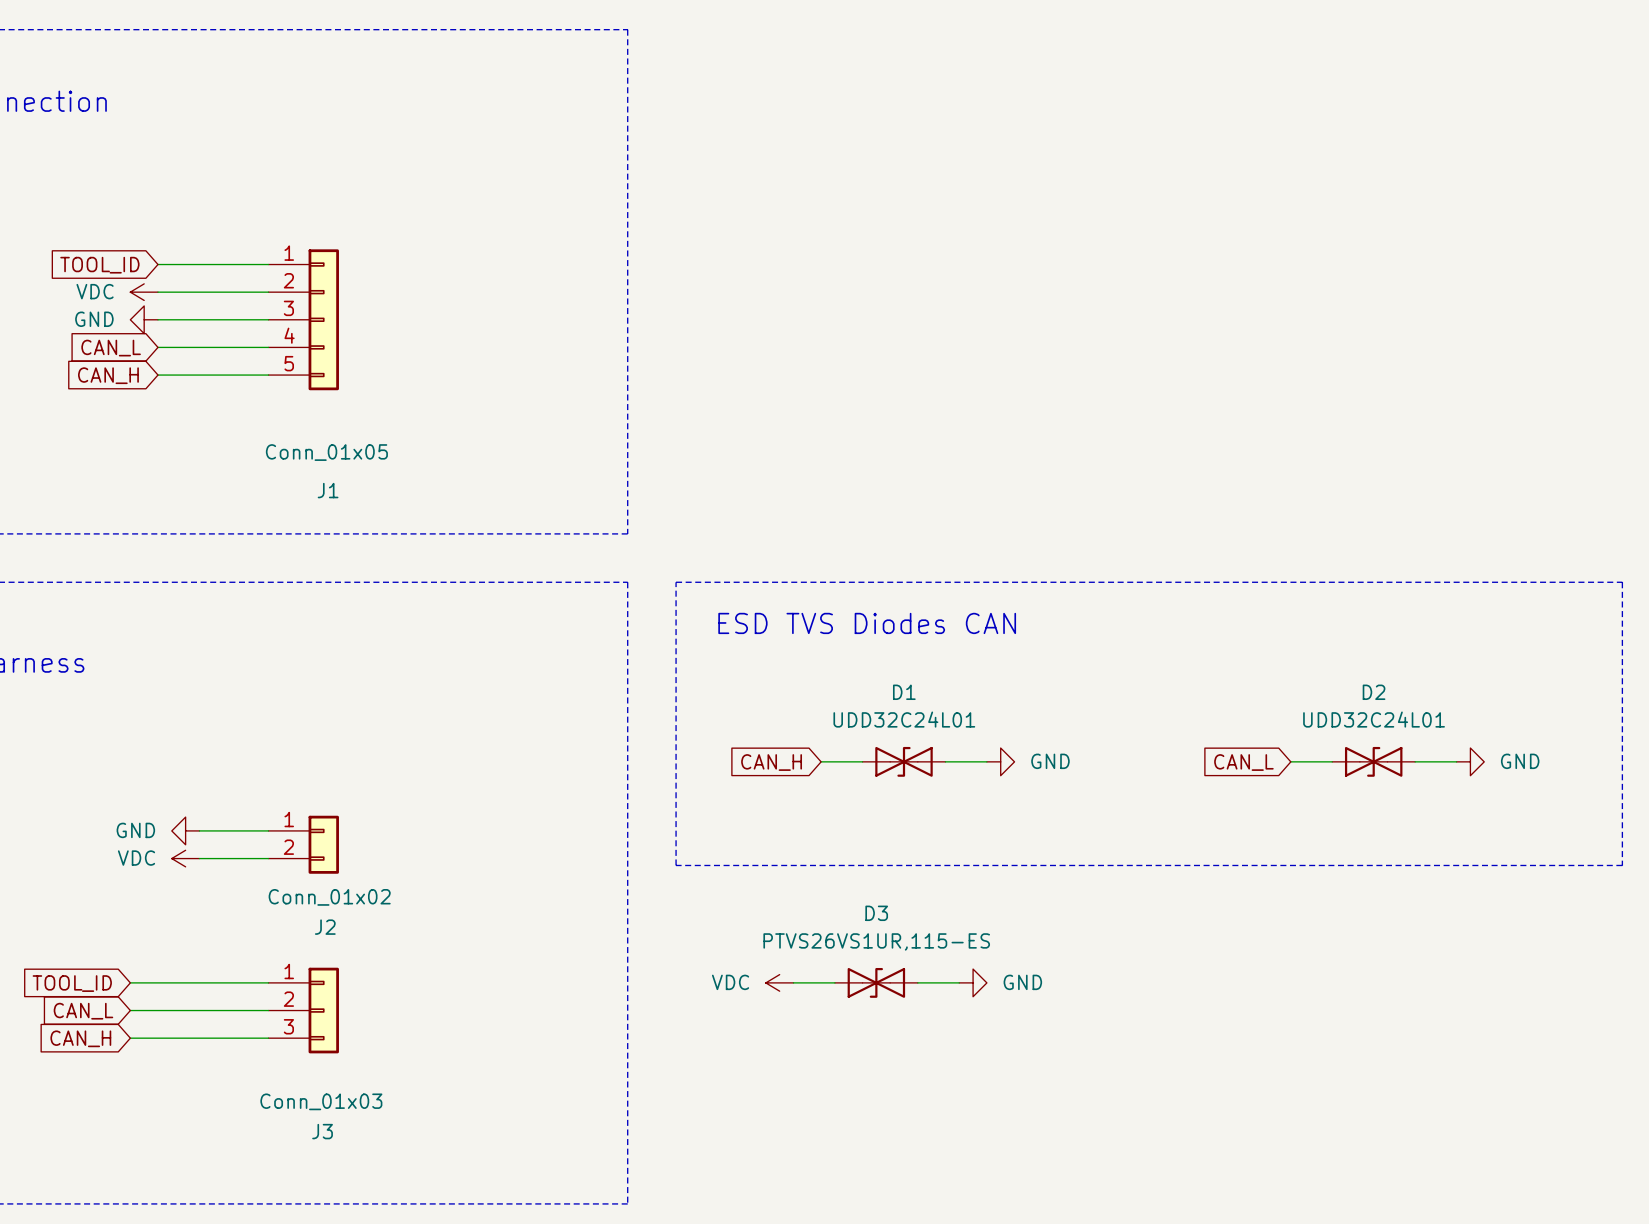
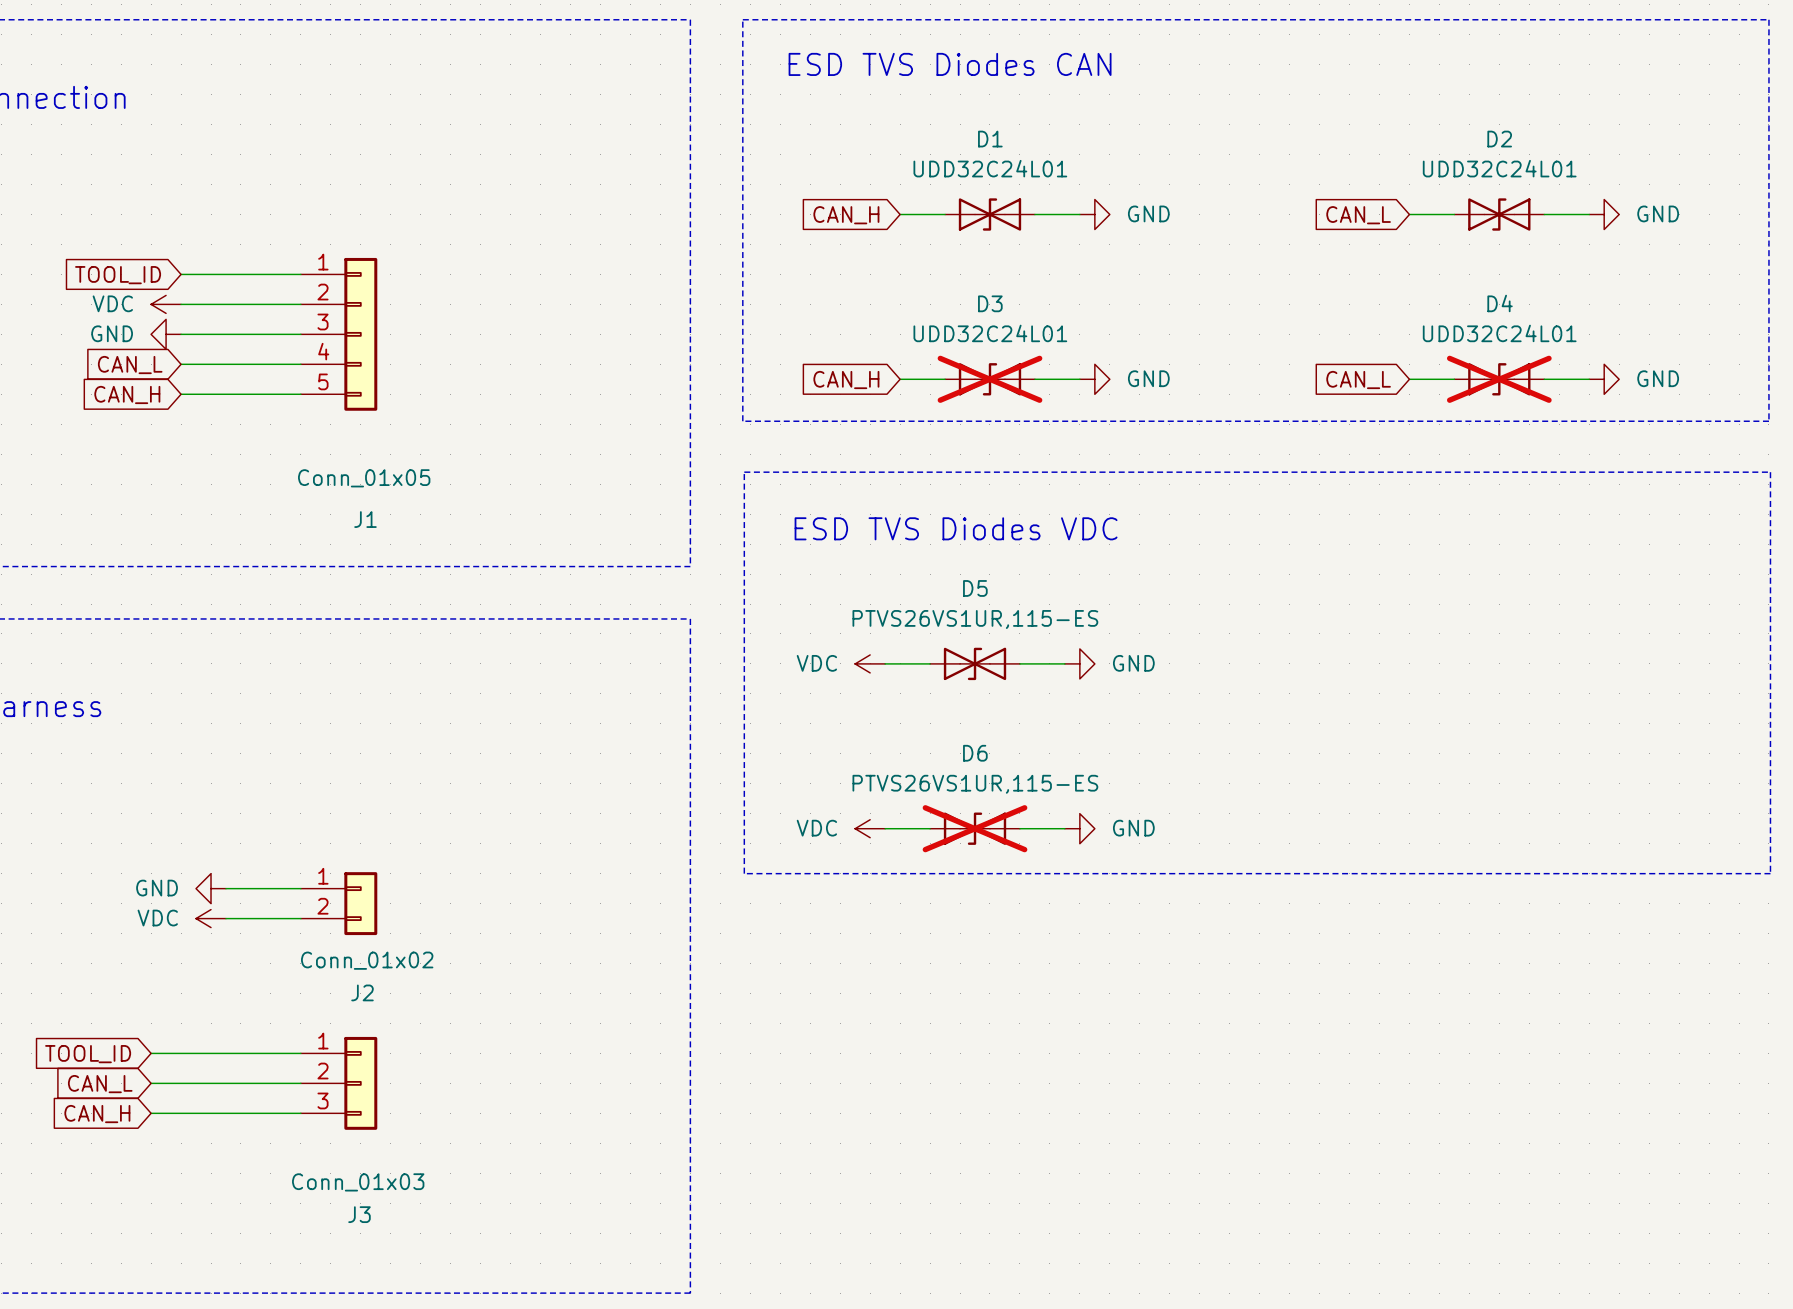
line: none -> (742, 19) (1768, 19) (1768, 421) (742, 421) (742, 19)
text: none -> ESD TVS Diodes CAN (950, 64)
global label: none -> CAN_H (846, 215)
wire: none -> (900, 214) (945, 214)
wire: none -> (1034, 214) (1079, 214)
power symbol: none -> GND (1094, 214)
global label: none -> CAN_L (1358, 215)
wire: none -> (1409, 214) (1454, 214)
wire: none -> (1544, 214) (1589, 214)
power symbol: none -> GND (1604, 214)
global label: none -> CAN_H (846, 380)
wire: none -> (900, 379) (945, 379)
D3 do-not-place cross: none -> (989, 379)
wire: none -> (1034, 379) (1079, 379)
power symbol: none -> GND (1094, 379)
global label: none -> CAN_L (1358, 380)
wire: none -> (1409, 379) (1454, 379)
D4: none -> UDD32C24L01 (1499, 379)
wire: none -> (1544, 379) (1589, 379)
power symbol: none -> GND (1604, 379)
text: none -> ESD TVS Diodes VDC (956, 528)
line: (676, 582) (1622, 582) (1622, 865) (676, 865) (676, 582) -> (744, 472) (744, 873) (1770, 873) (1770, 472) (744, 472)
power symbol: none -> VDC (870, 663)
wire: none -> (885, 663) (930, 663)
text: ESD TVS Diodes CAN (867, 623) -> none
D5: none -> PTVS26VS1UR,115-ES (975, 663)
wire: none -> (1019, 663) (1064, 663)
power symbol: none -> GND (1079, 663)
wire: (821, 761) (862, 761) -> (885, 828) (930, 828)
D1 position: (904, 761) -> (989, 214)
wire: (945, 761) (986, 761) -> (1019, 828) (1064, 828)
power symbol position: GND (1000, 761) -> GND (1079, 828)
wire: (1290, 761) (1332, 761) -> none
D2 position: (1373, 761) -> (1499, 214)
wire: (1415, 761) (1456, 761) -> none
power symbol: GND (1470, 761) -> none
global label: CAN_H (771, 762) -> none
global label: CAN_L (1243, 762) -> none
power symbol: none -> VDC (870, 828)
D6: none -> PTVS26VS1UR,115-ES (975, 828)
D3 value: PTVS26VS1UR,115-ES (876, 941) -> UDD32C24L01 (990, 333)
power symbol: VDC (779, 982) -> none
wire: (793, 982) (834, 982) -> none
D3 position: (876, 982) -> (989, 379)
wire: (917, 982) (959, 982) -> none
power symbol: GND (973, 982) -> none

